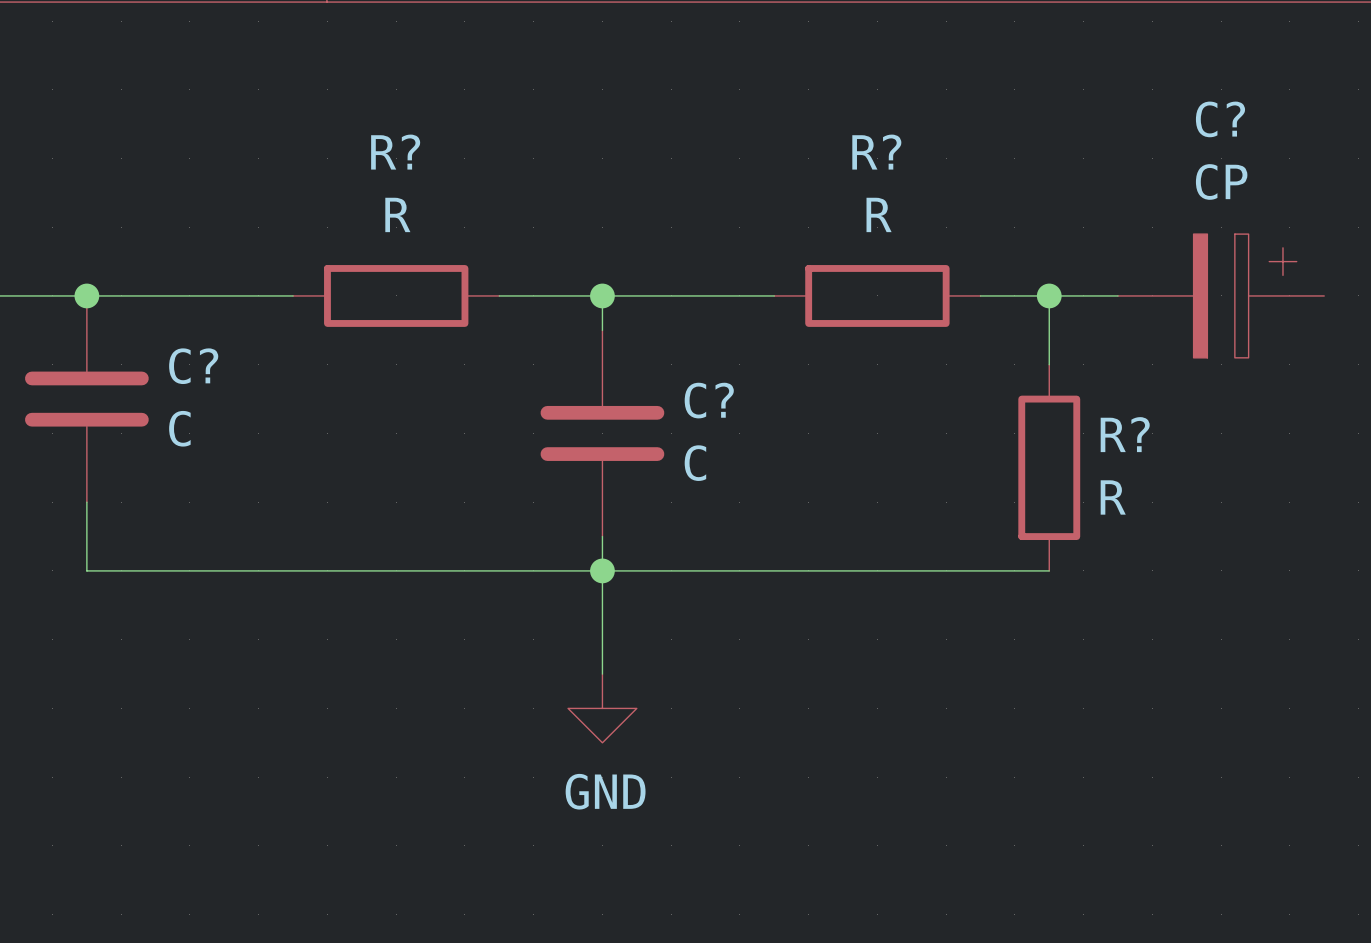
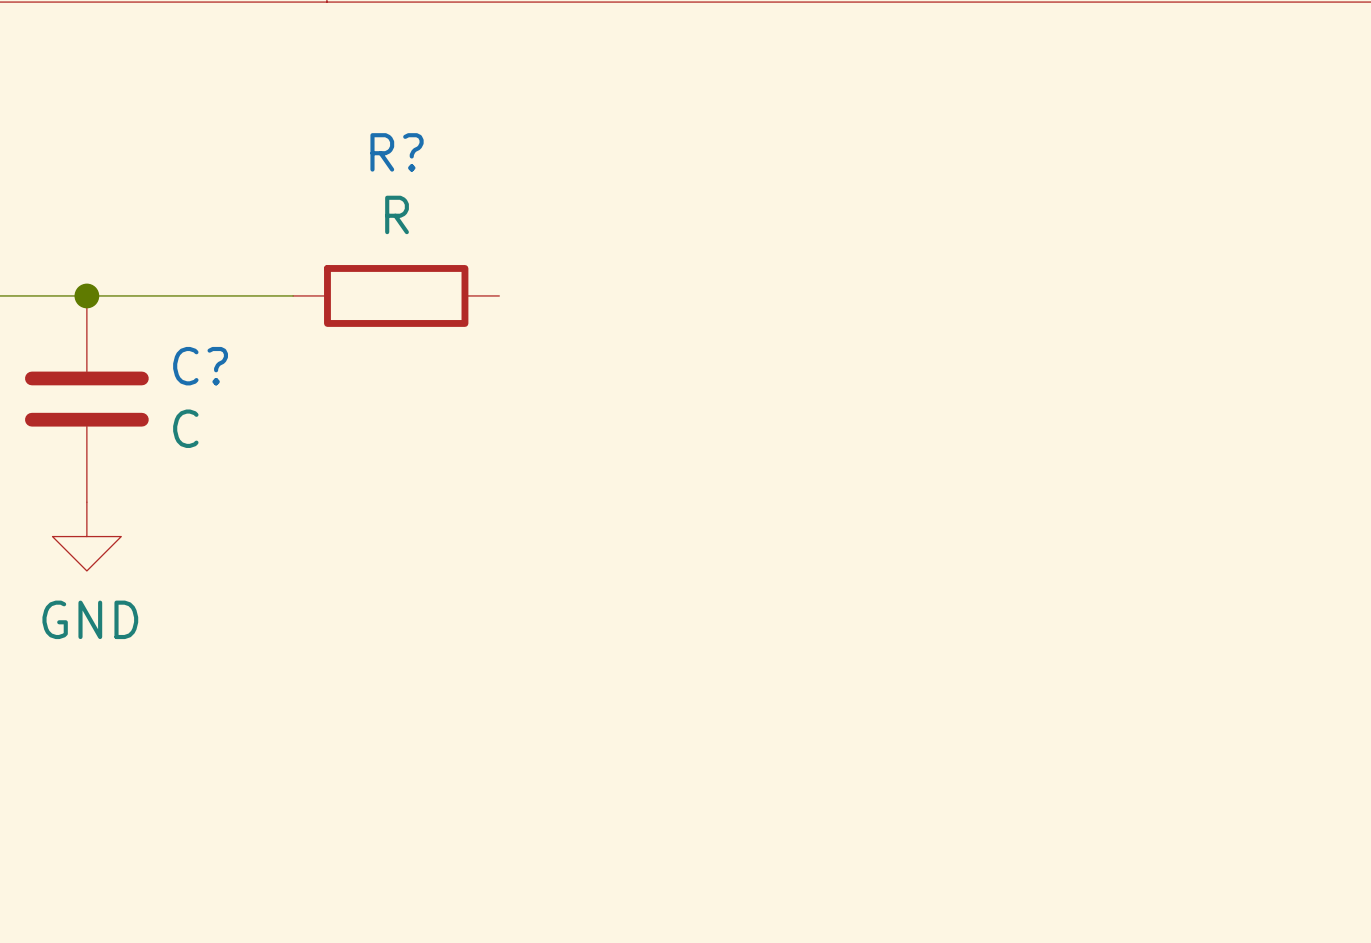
wire: (499, 295) (774, 295) -> none
wire: (602, 295) (602, 330) -> none
junction: (602, 295) -> none
R?: R (877, 295) -> none
wire: (980, 295) (1118, 295) -> none
wire: (1049, 295) (1049, 364) -> none
junction: (1049, 295) -> none
C?: CP (1221, 295) -> none
C?: C (602, 433) -> none
R?: R (1049, 467) -> none
wire: (86, 502) (86, 570) (1049, 570) -> none
wire: (602, 536) (602, 674) -> none
junction: (602, 570) -> none
power symbol position: GND (602, 708) -> GND (86, 536)

